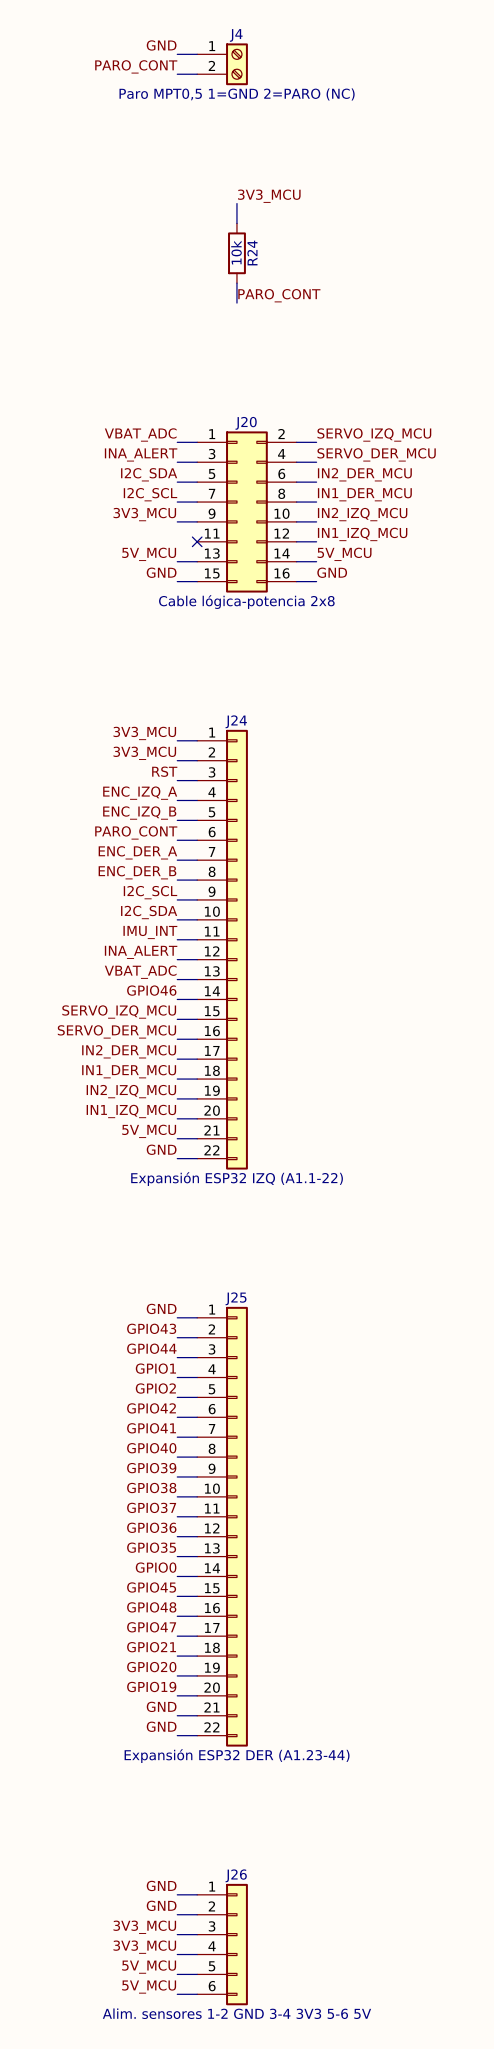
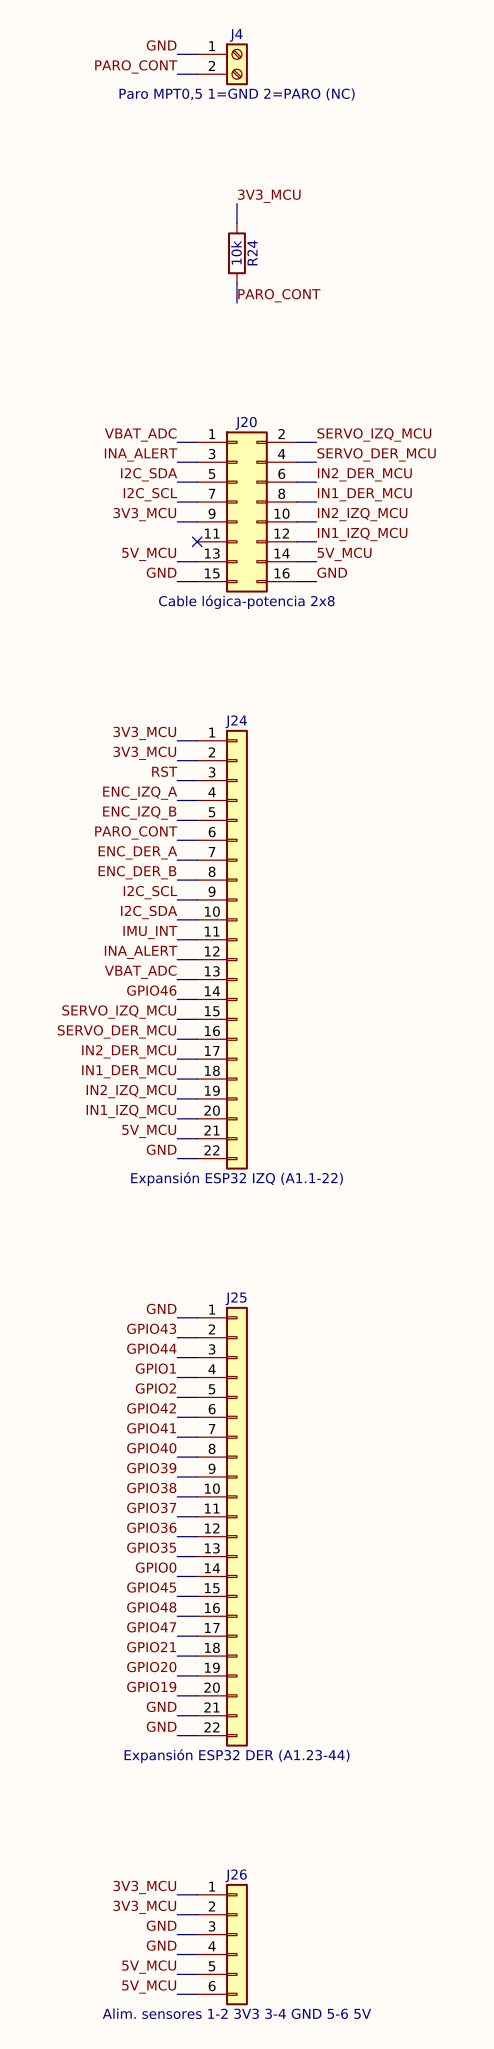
label: GND (161, 1885) -> 3V3_MCU (144, 1887)
label: GND (161, 1905) -> 3V3_MCU (144, 1907)
label: 3V3_MCU (144, 1927) -> GND (161, 1925)
label: 3V3_MCU (144, 1947) -> GND (161, 1945)
J26 value: Alim. sensores 1-2 GND 3-4 3V3 5-6 5V (236, 2013) -> Alim. sensores 1-2 3V3 3-4 GND 5-6 5V (236, 2013)

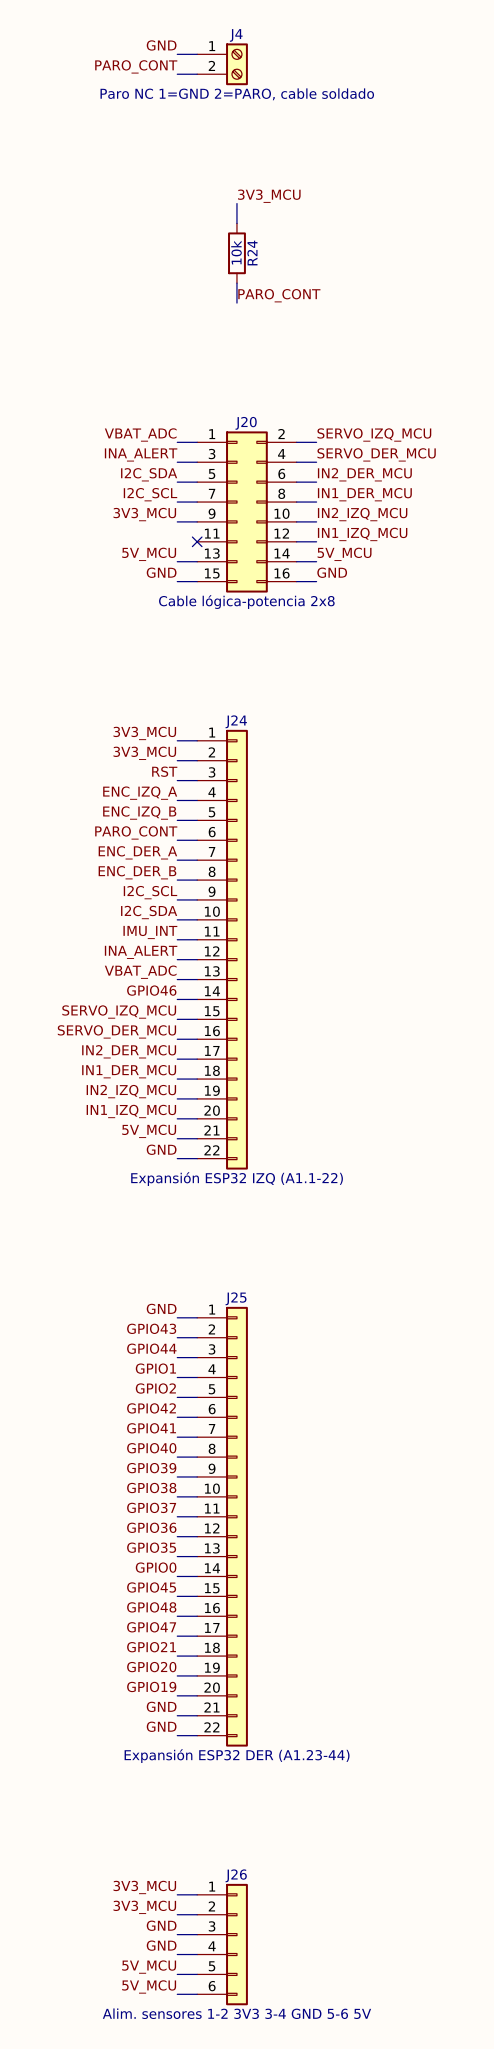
J4 value: Paro MPT0,5 1=GND 2=PARO (NC) (237, 94) -> Paro NC 1=GND 2=PARO, cable soldado (237, 94)

